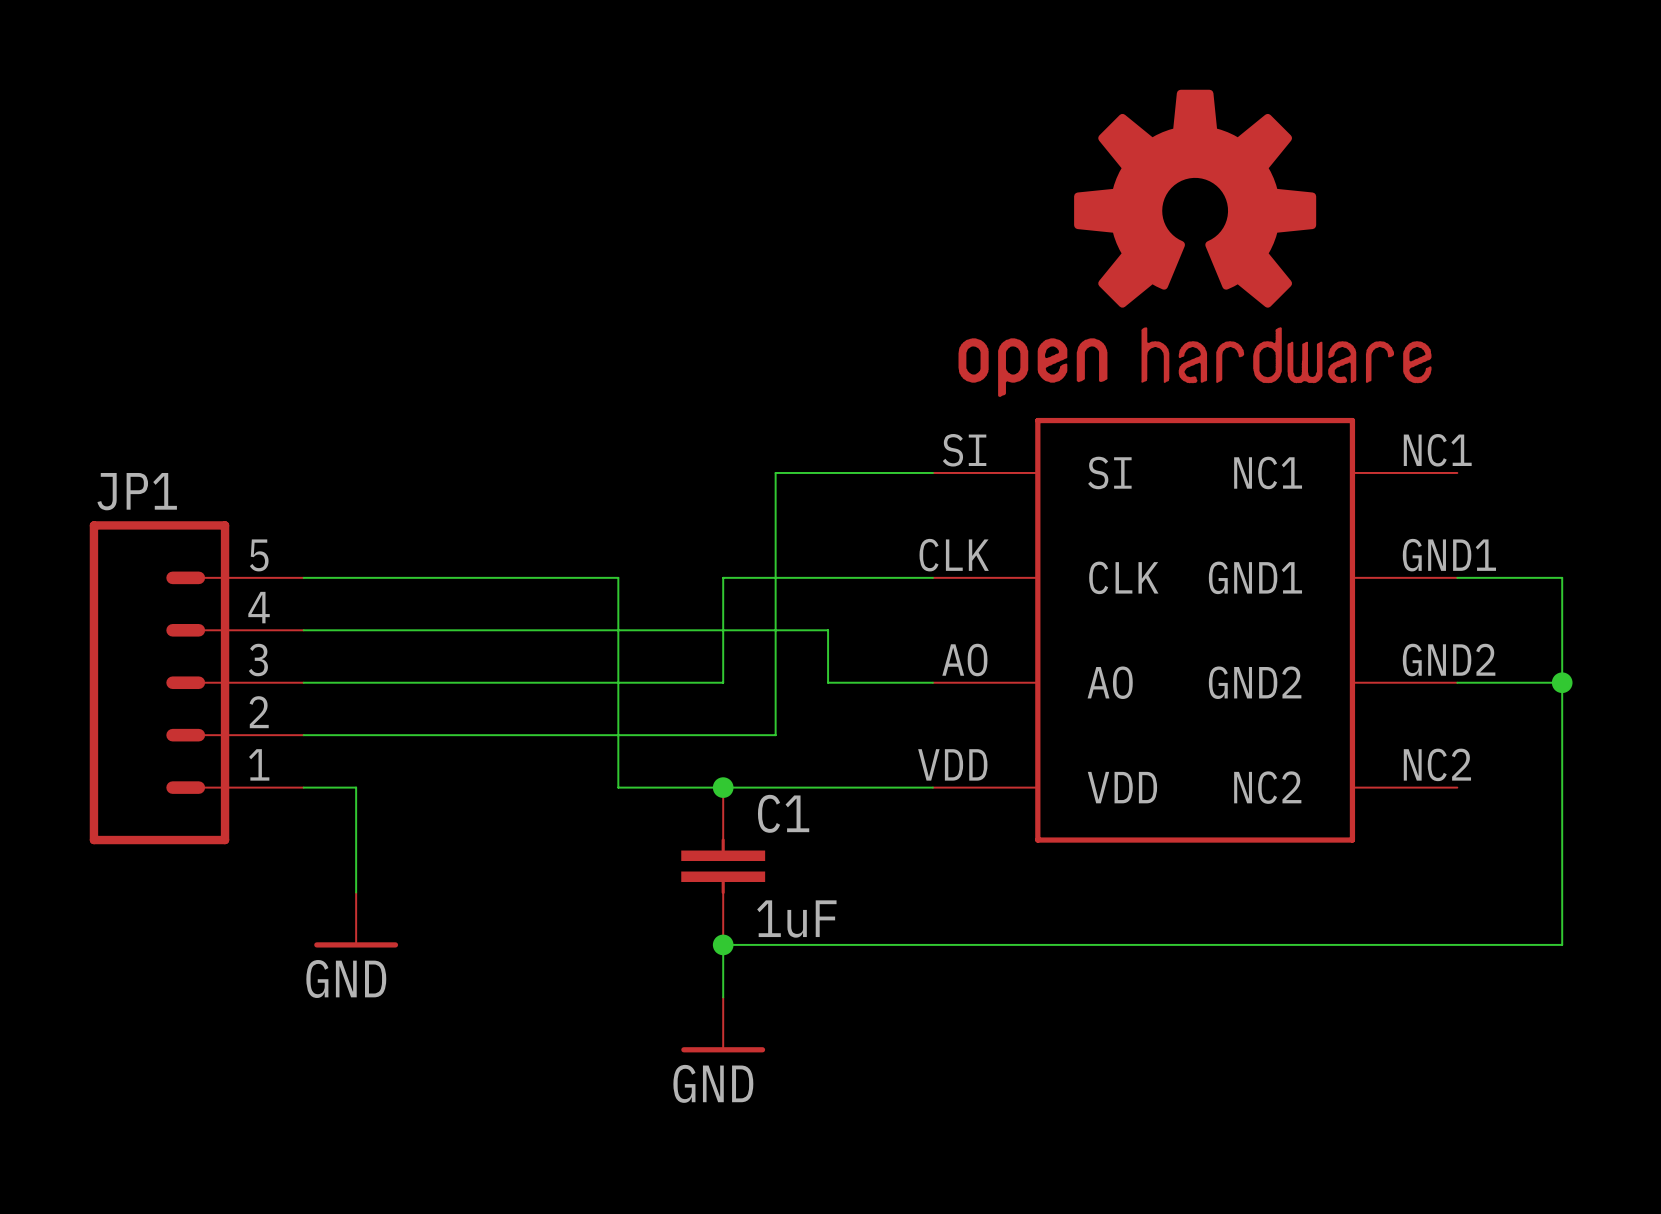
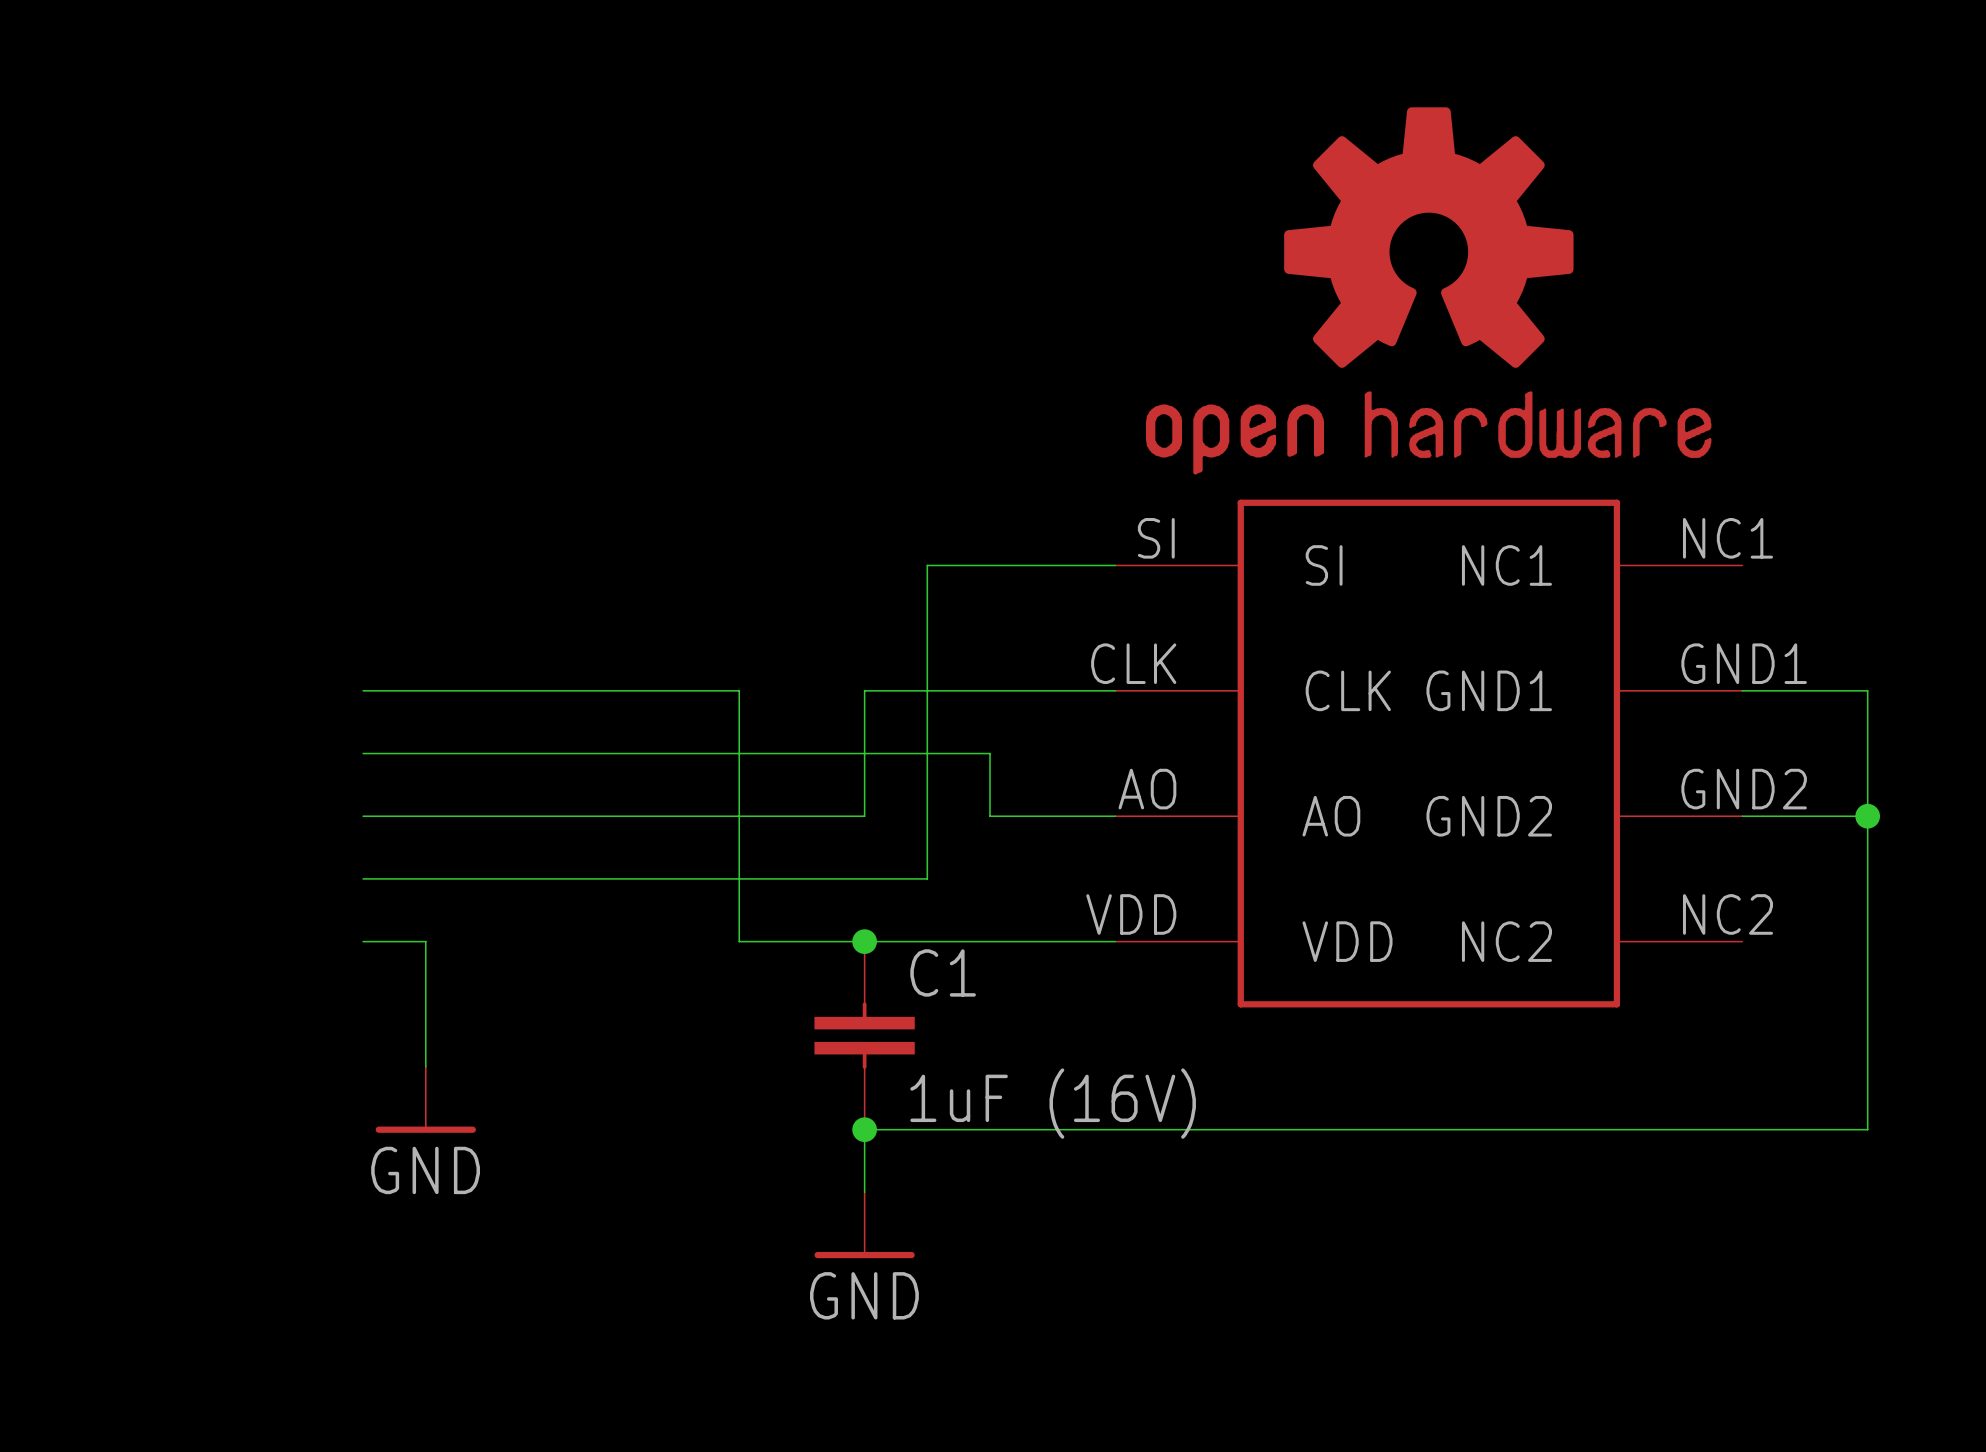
JP1: (196, 682) -> none
C1 value: 1uF (796, 919) -> 1uF (16V) (1053, 1103)

